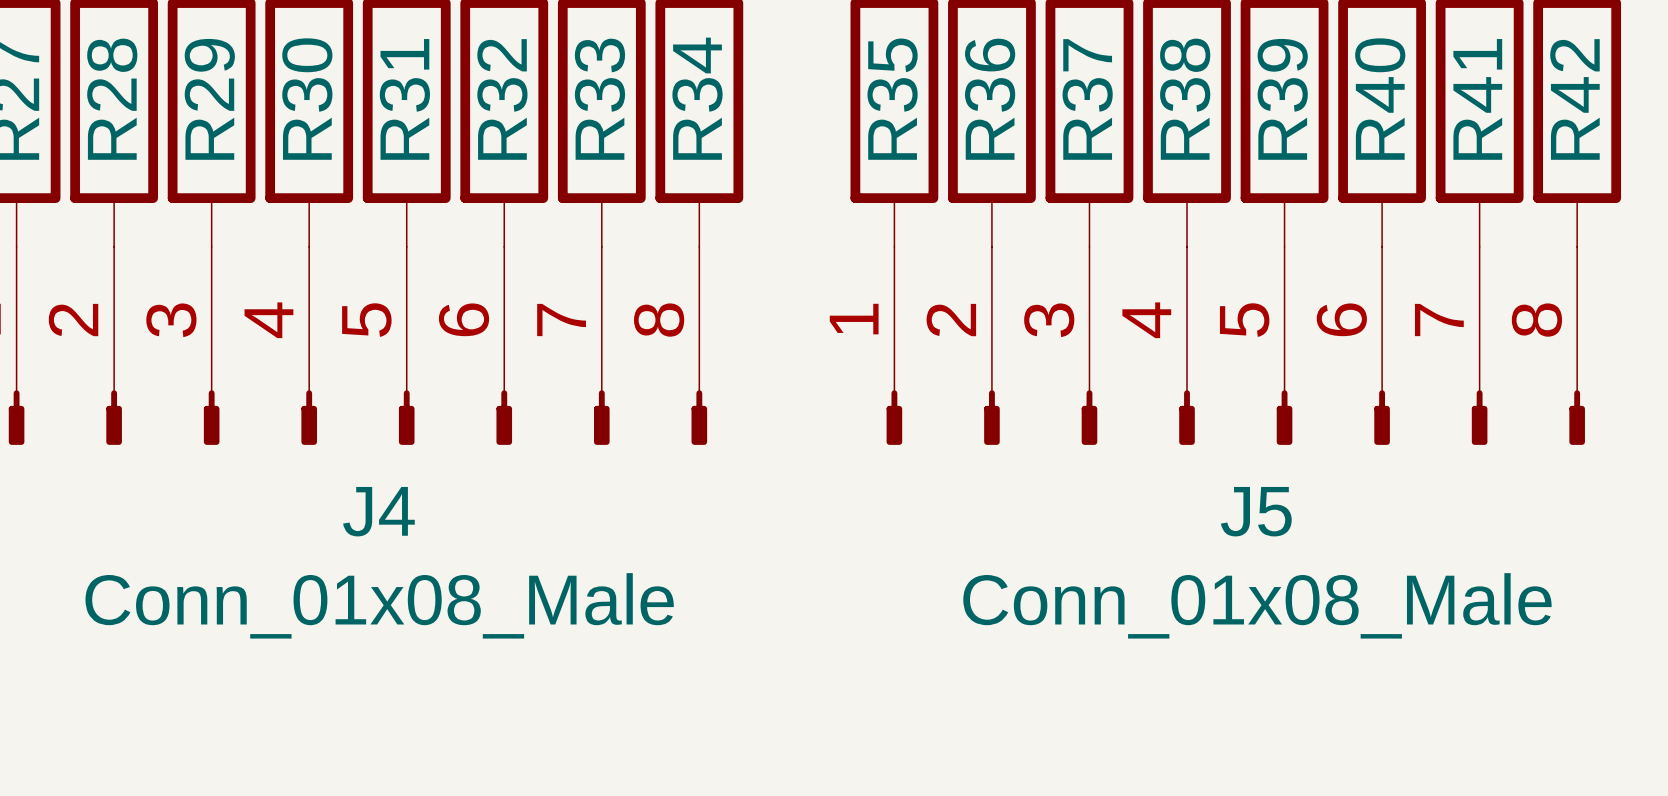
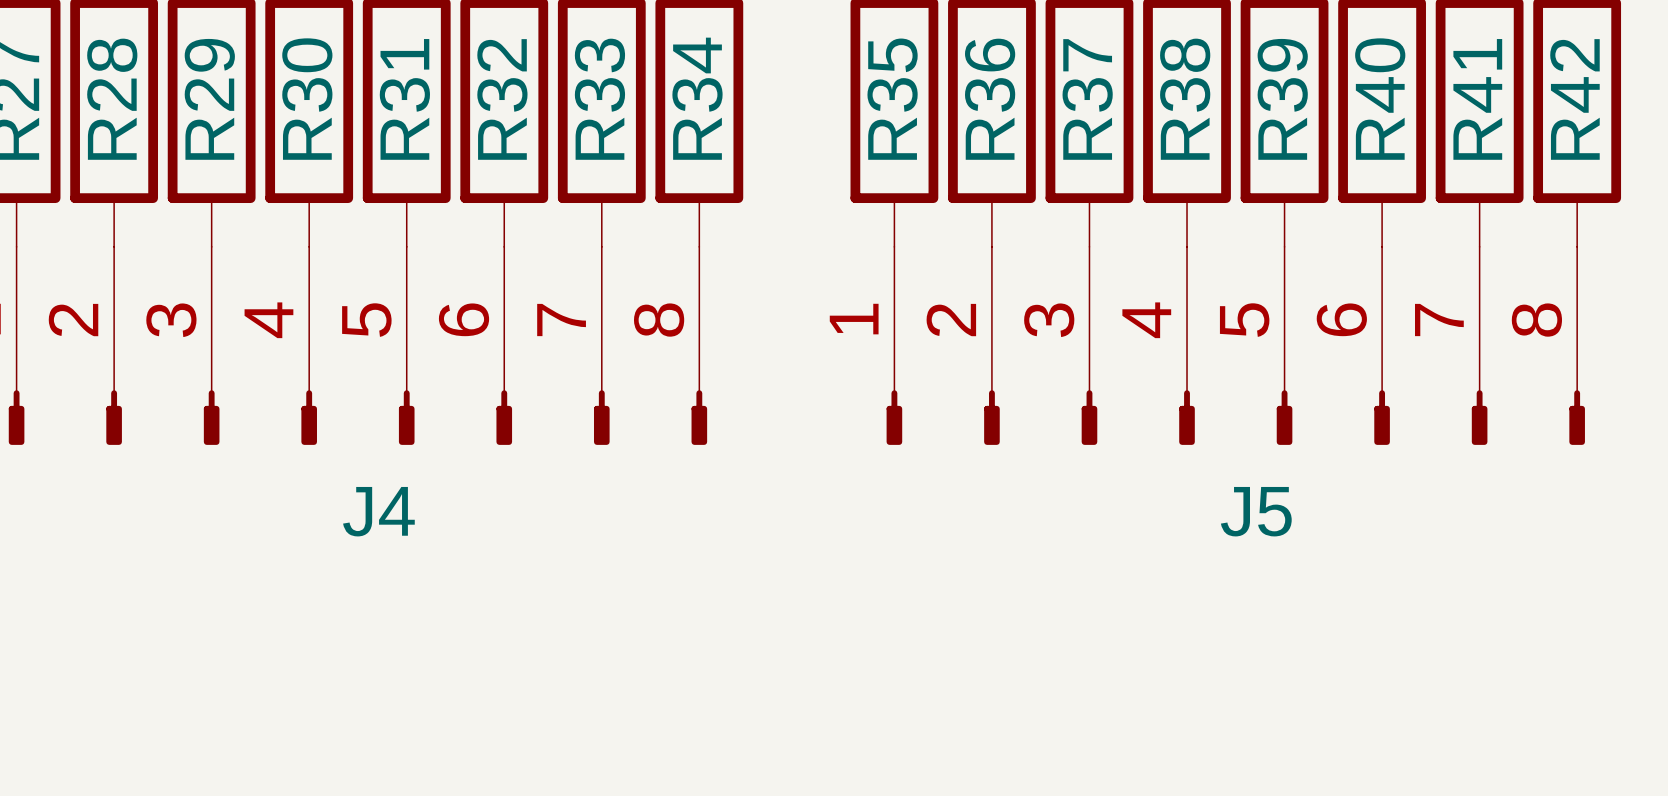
J4 value: Conn_01x08_Male (379, 605) -> none
J5 value: Conn_01x08_Male (1257, 605) -> none

